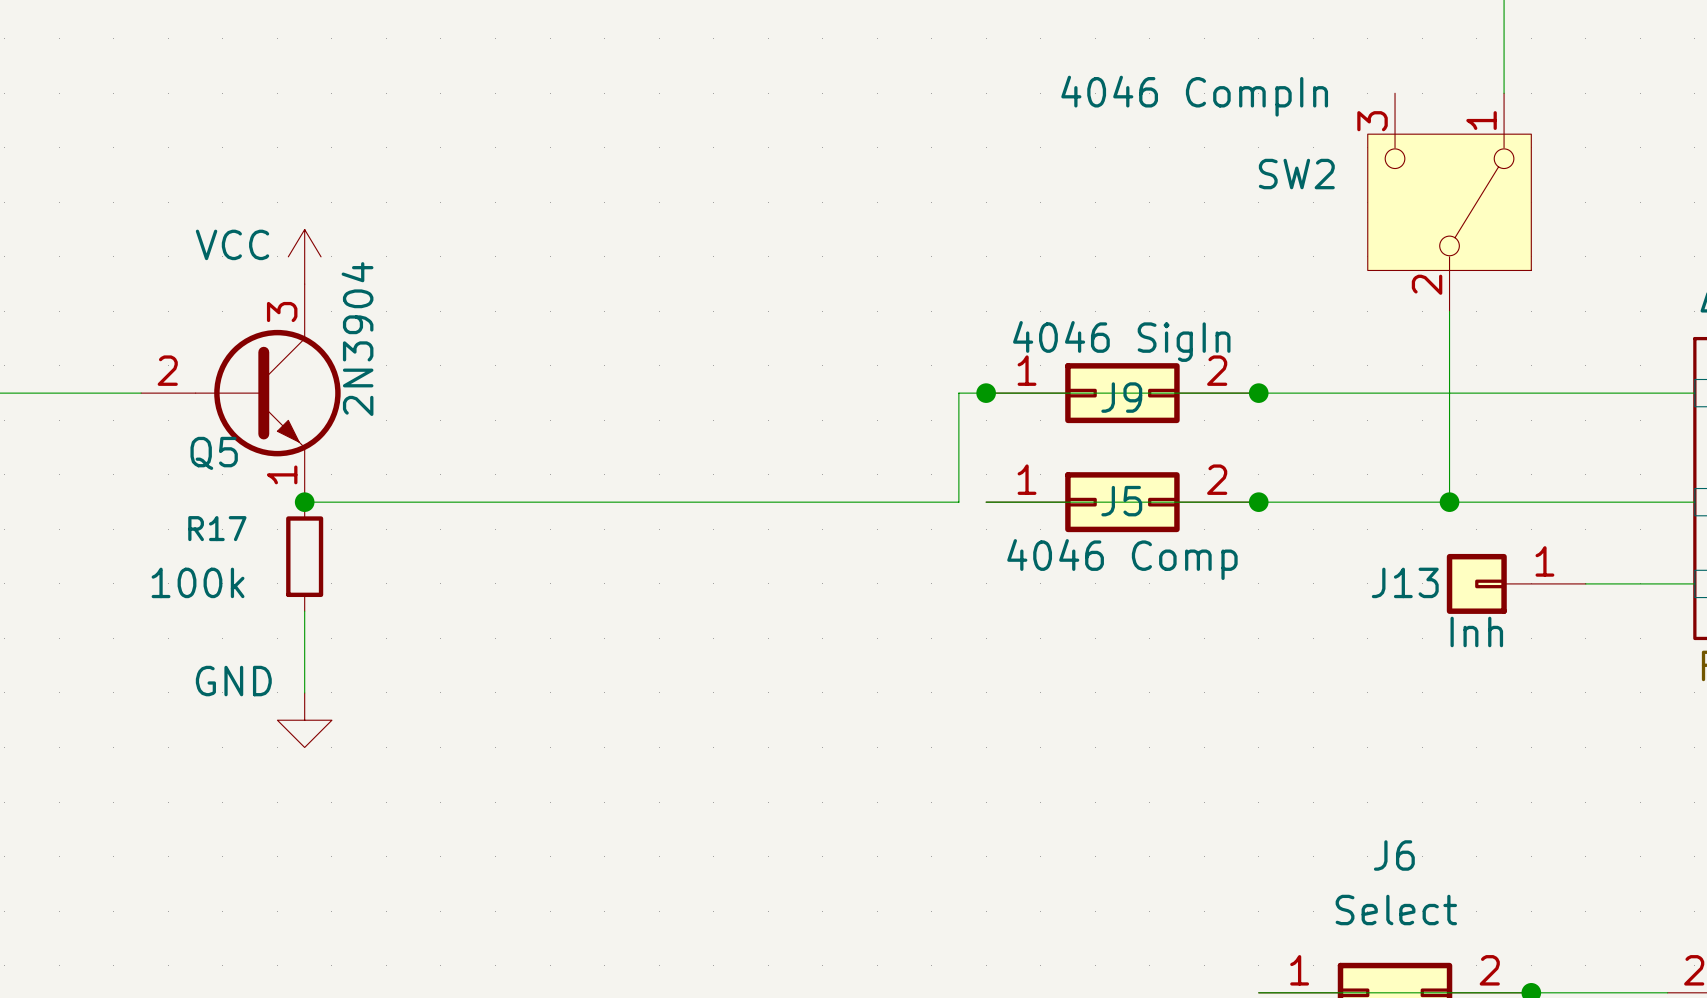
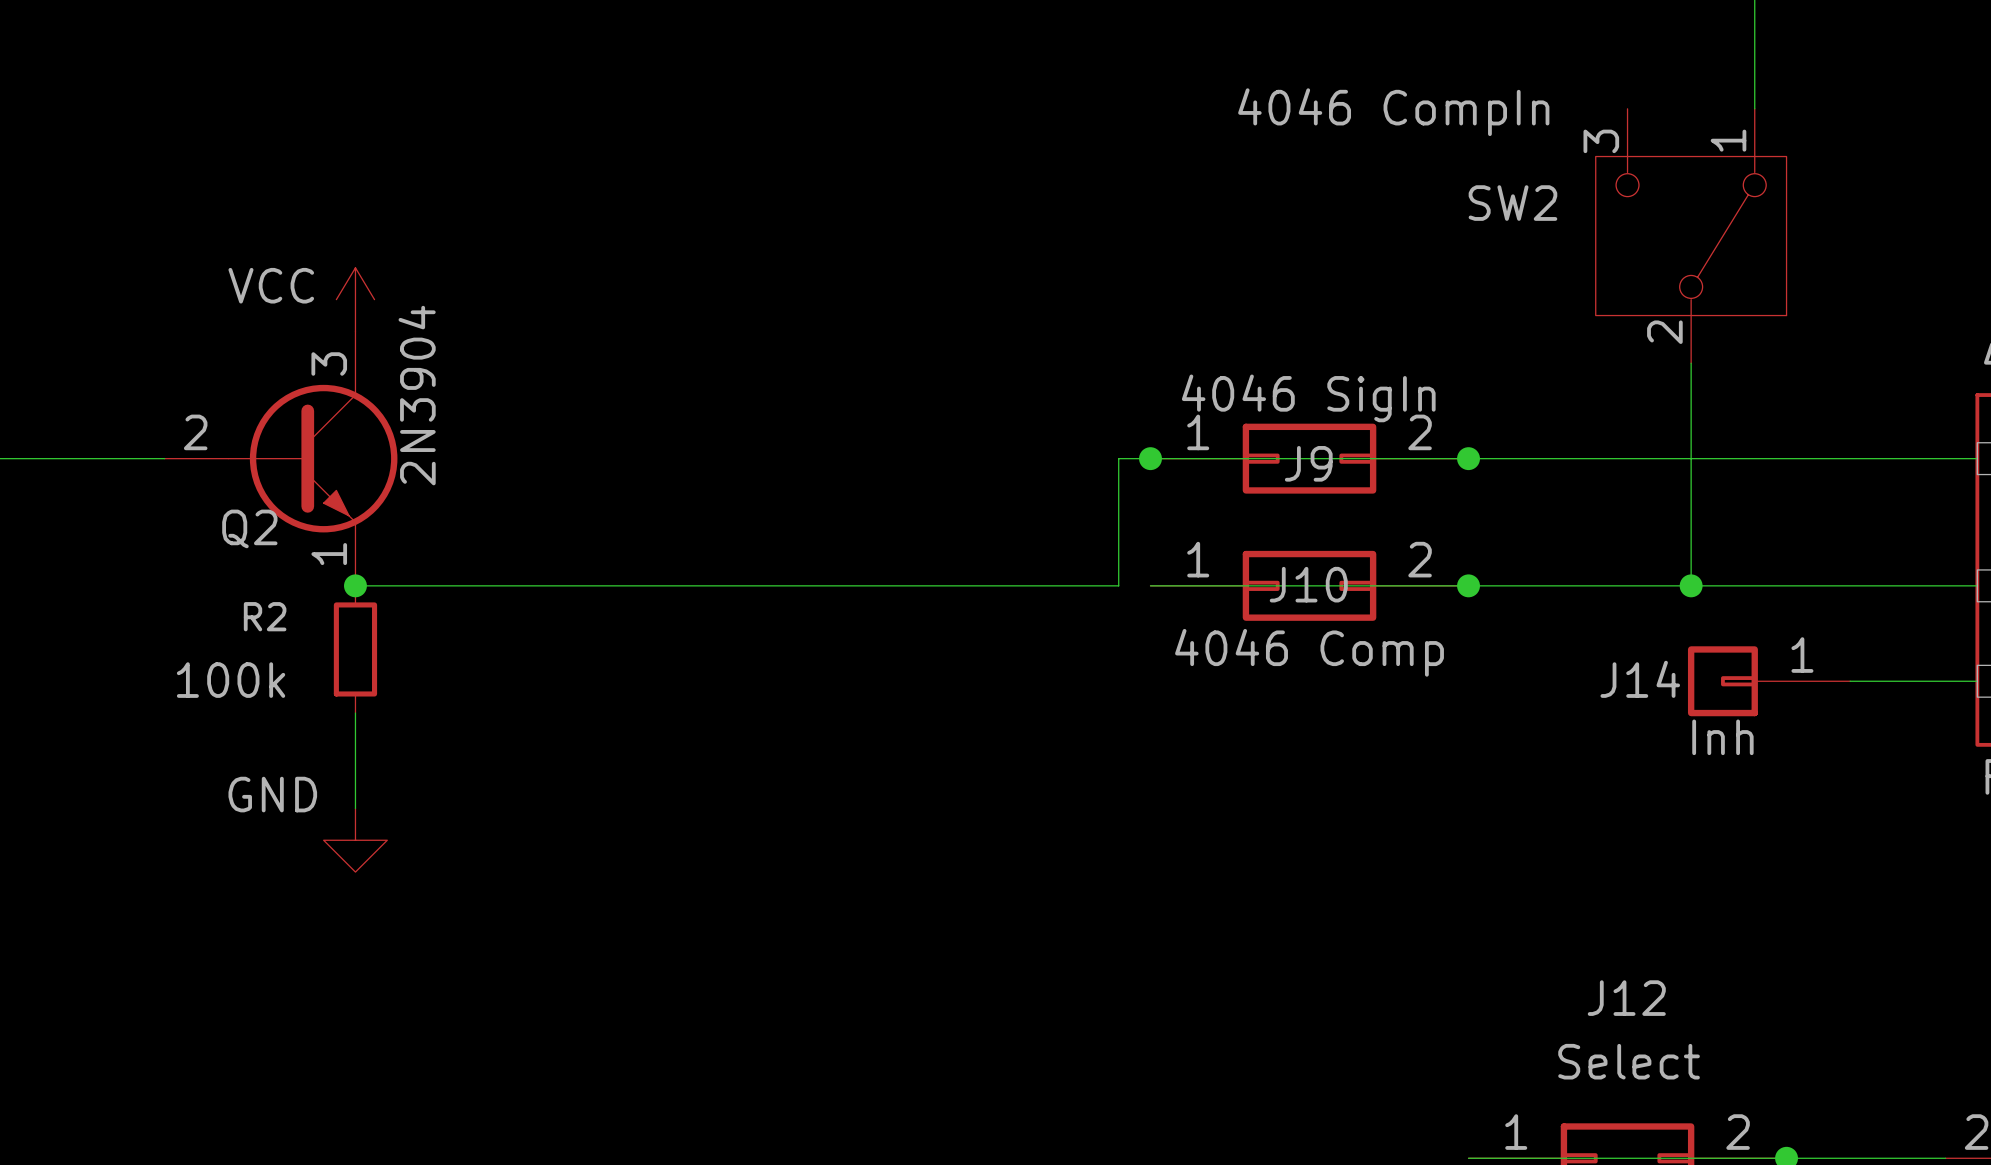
Q5 name: Q5 (214, 453) -> Q2 (249, 528)
J5 name: J5 (1121, 501) -> J10 (1308, 584)
R17 name: R17 (217, 528) -> R2 (265, 616)
J13 name: J13 (1405, 582) -> J14 (1640, 679)
J6 name: J6 (1394, 855) -> J12 (1626, 998)

